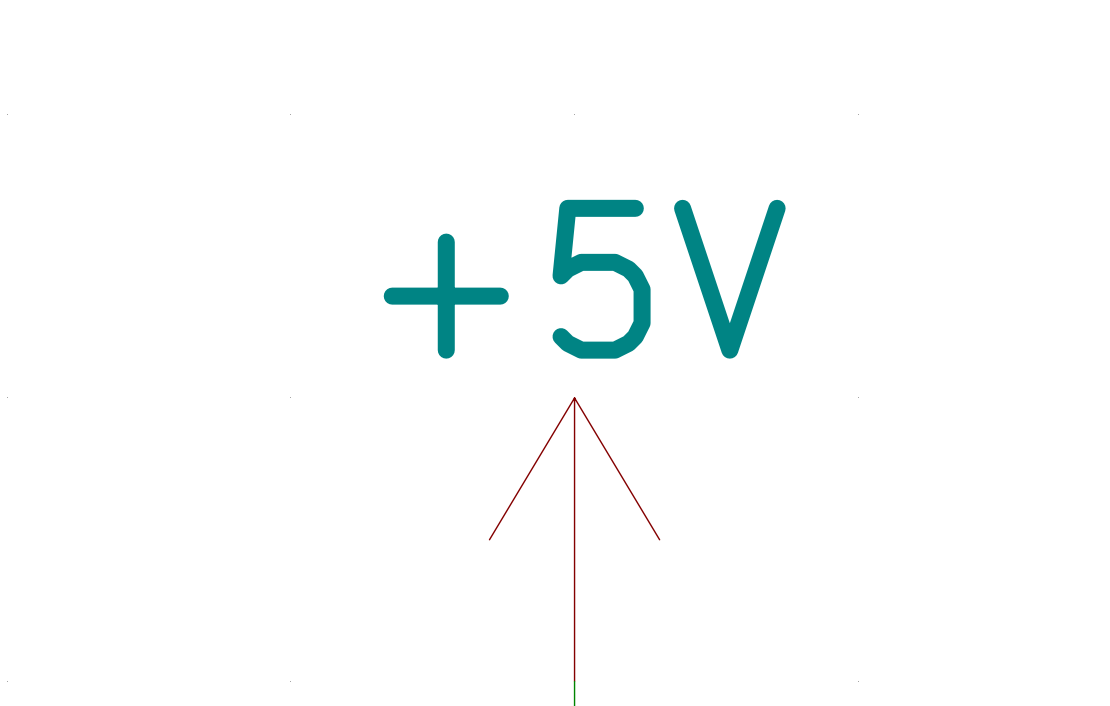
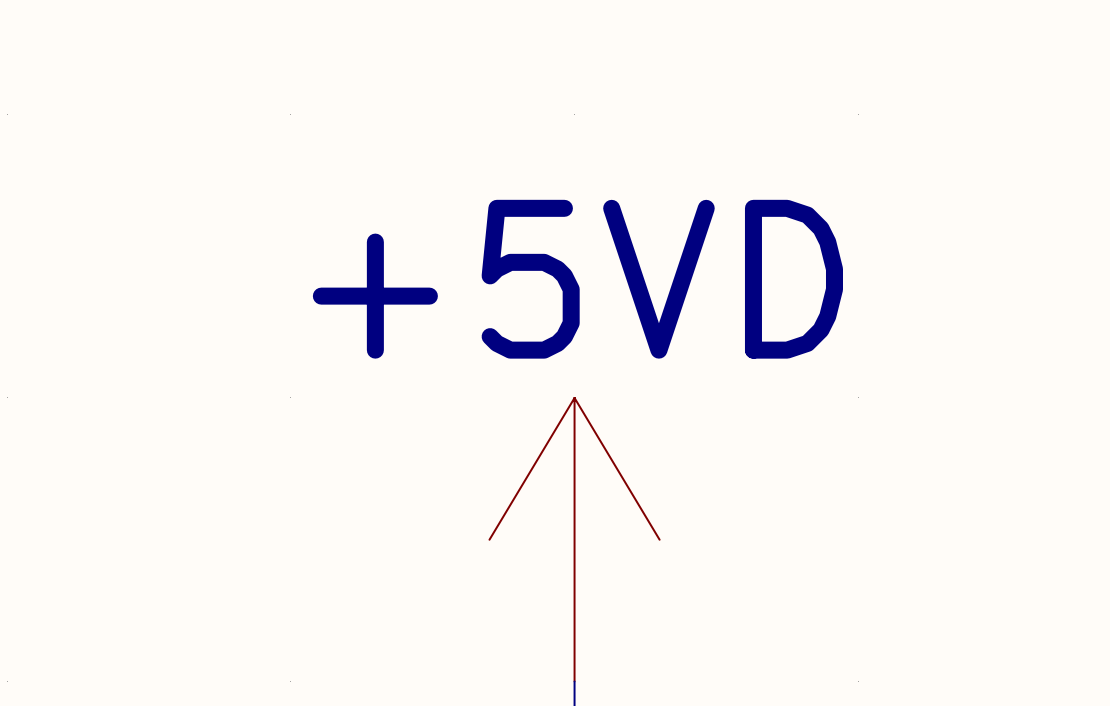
power symbol: +5V (574, 539) -> +5VD (574, 539)

